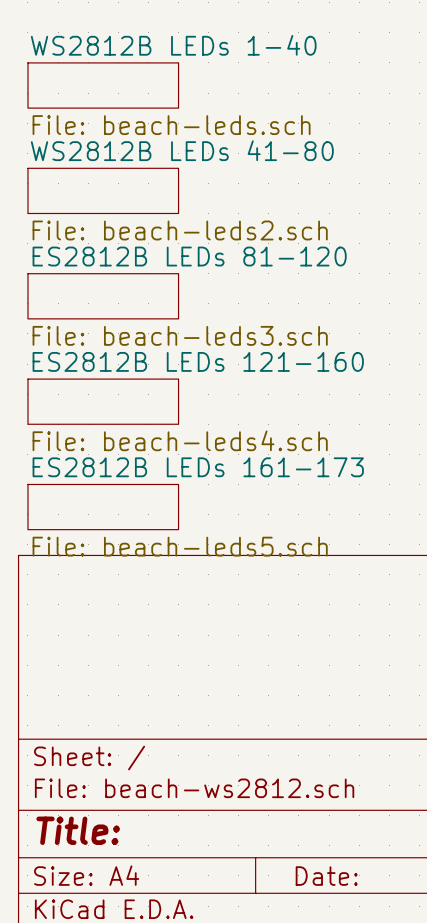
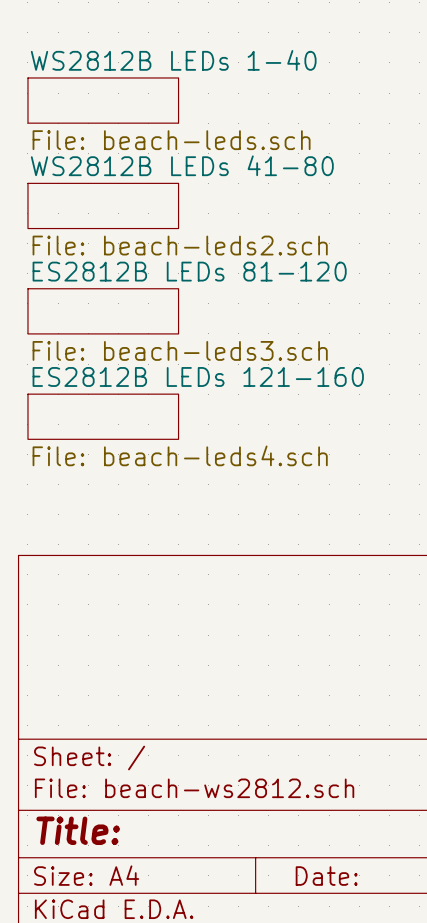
sheet WS2812B LEDs 1-40 position: (103, 85) -> (103, 100)
sheet WS2812B LEDs 41-80 position: (103, 190) -> (103, 205)
sheet ES2812B LEDs 81-120 position: (103, 296) -> (103, 311)
sheet ES2812B LEDs 121-160 position: (103, 401) -> (103, 416)
sheet ES2812B LEDs 161-173: File: beach-leds5.sch (103, 507) -> none

